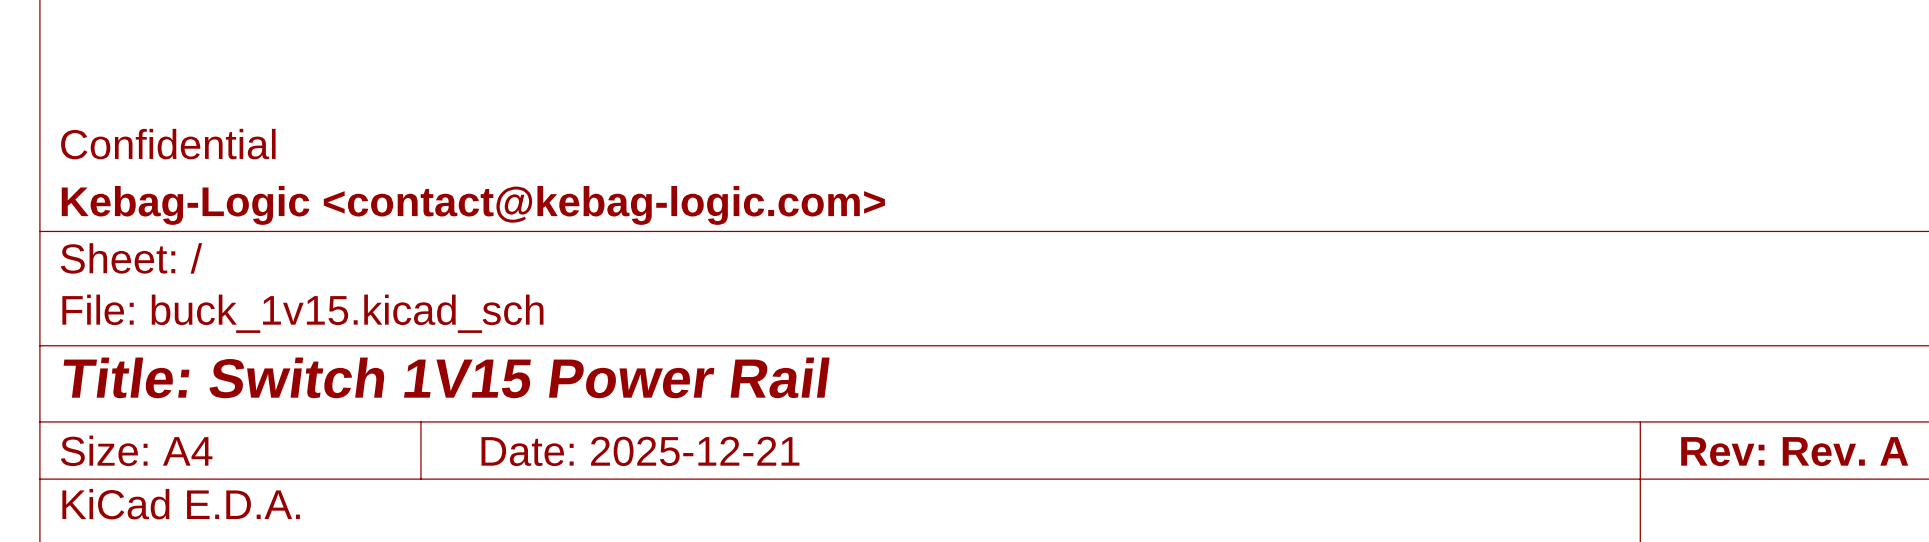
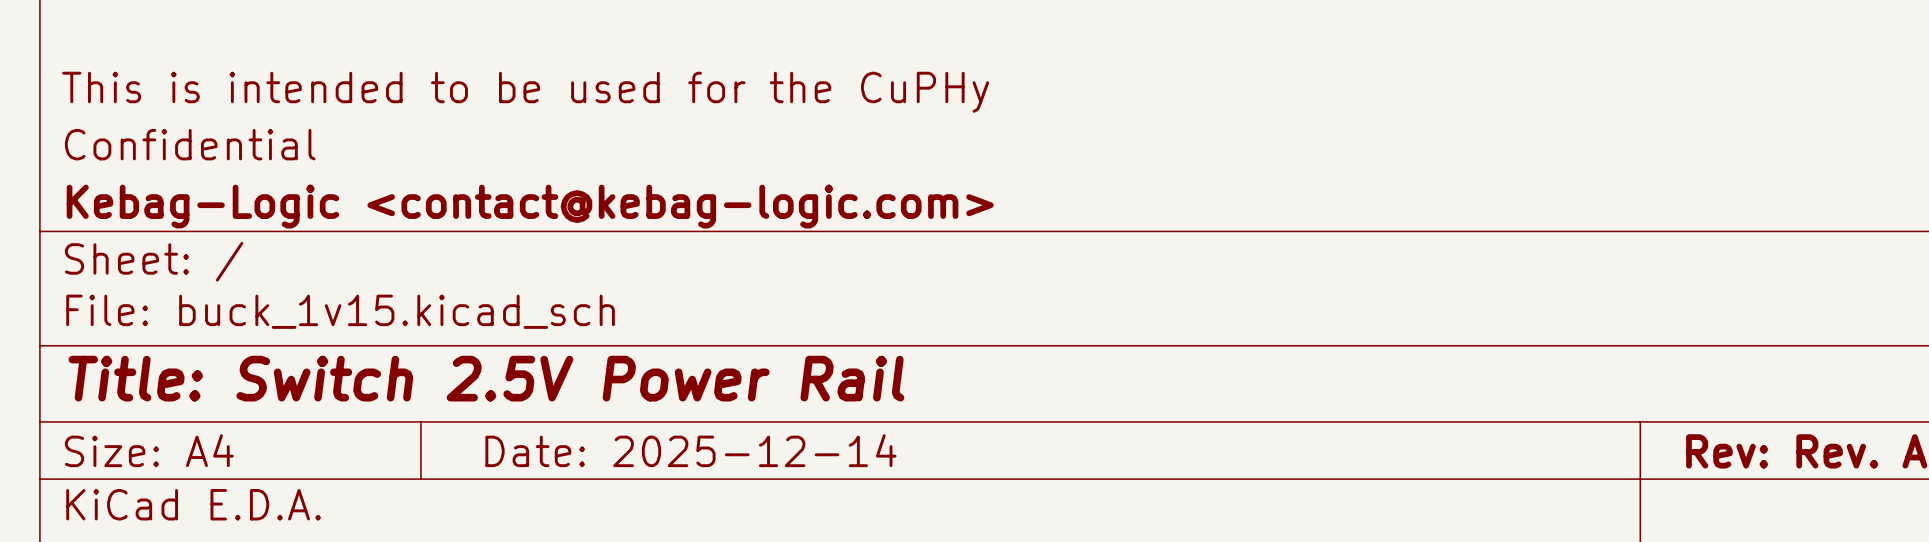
title block: none -> This is intended to be used for the CuPHy (525, 92)
title block: Title: Switch 1V15 Power Rail (446, 377) -> Title: Switch 2.5V Power Rail (486, 378)
title block: Date: 2025-12-21 (640, 451) -> Date: 2025-12-14 (690, 450)

